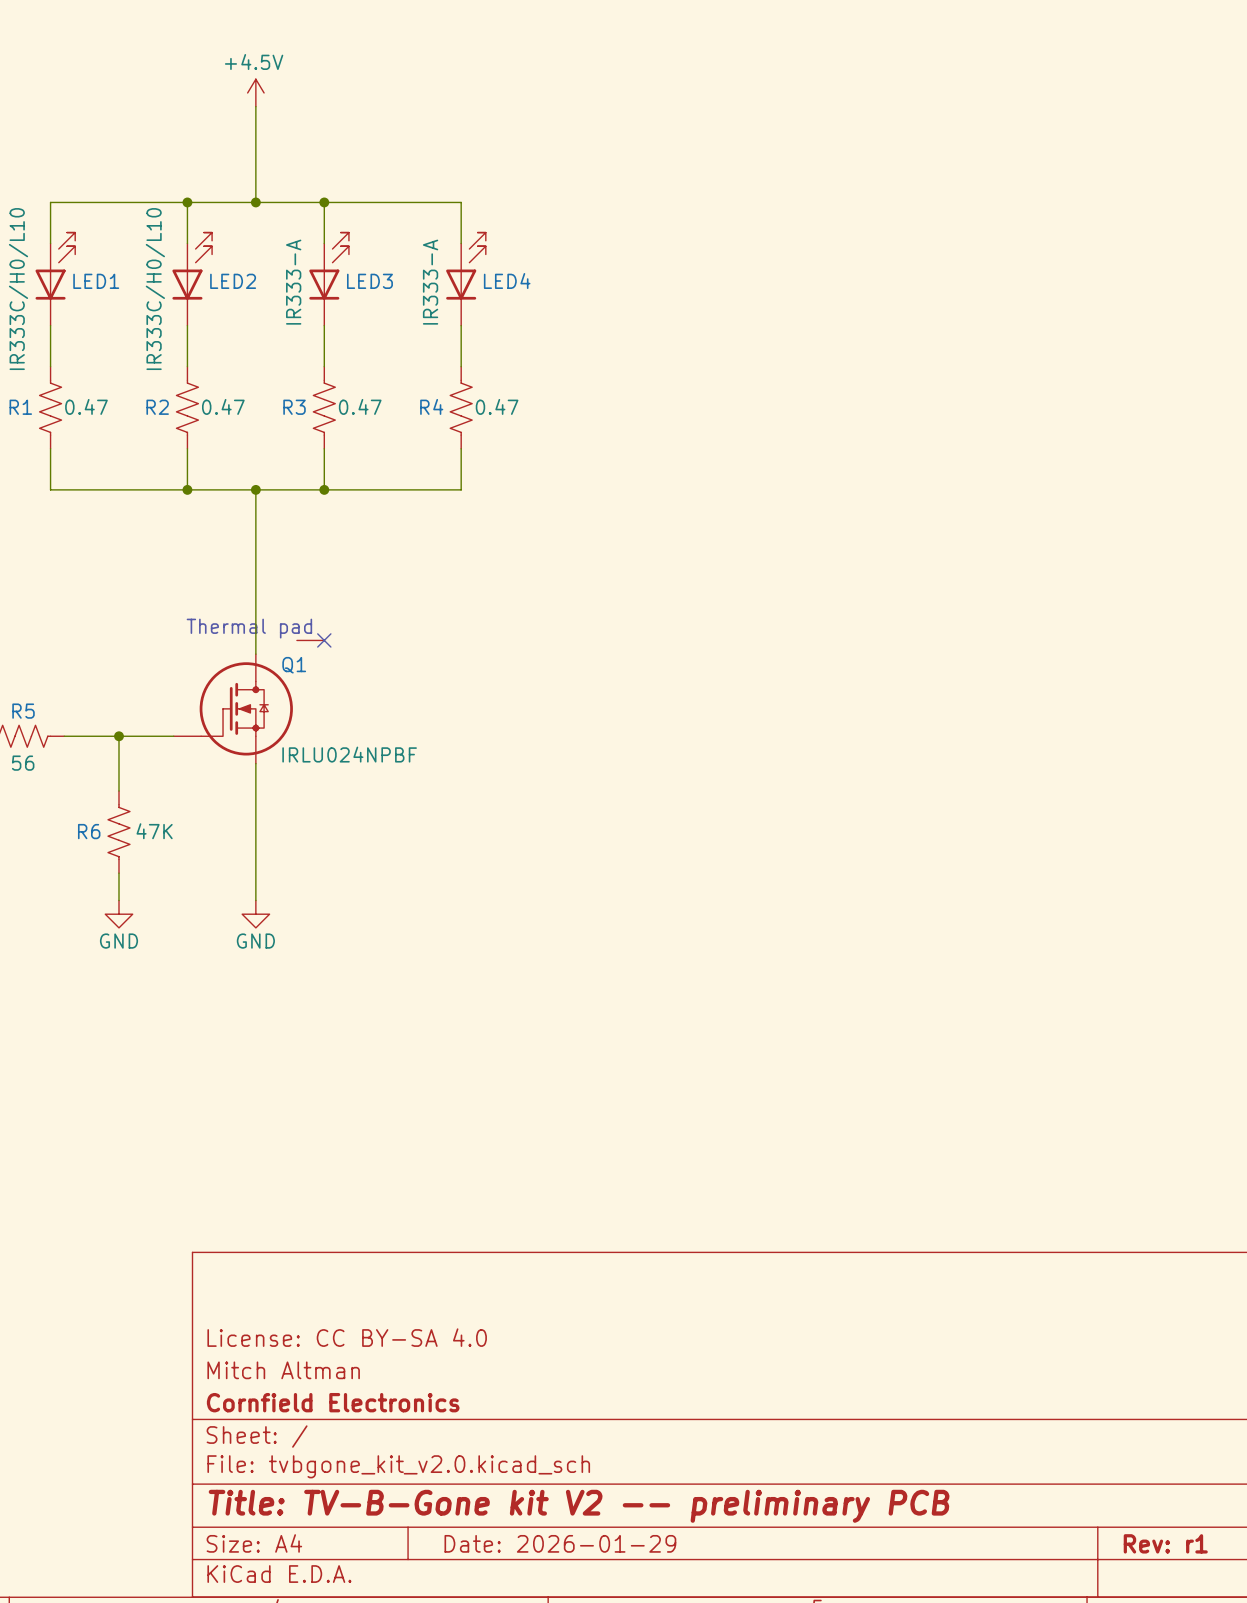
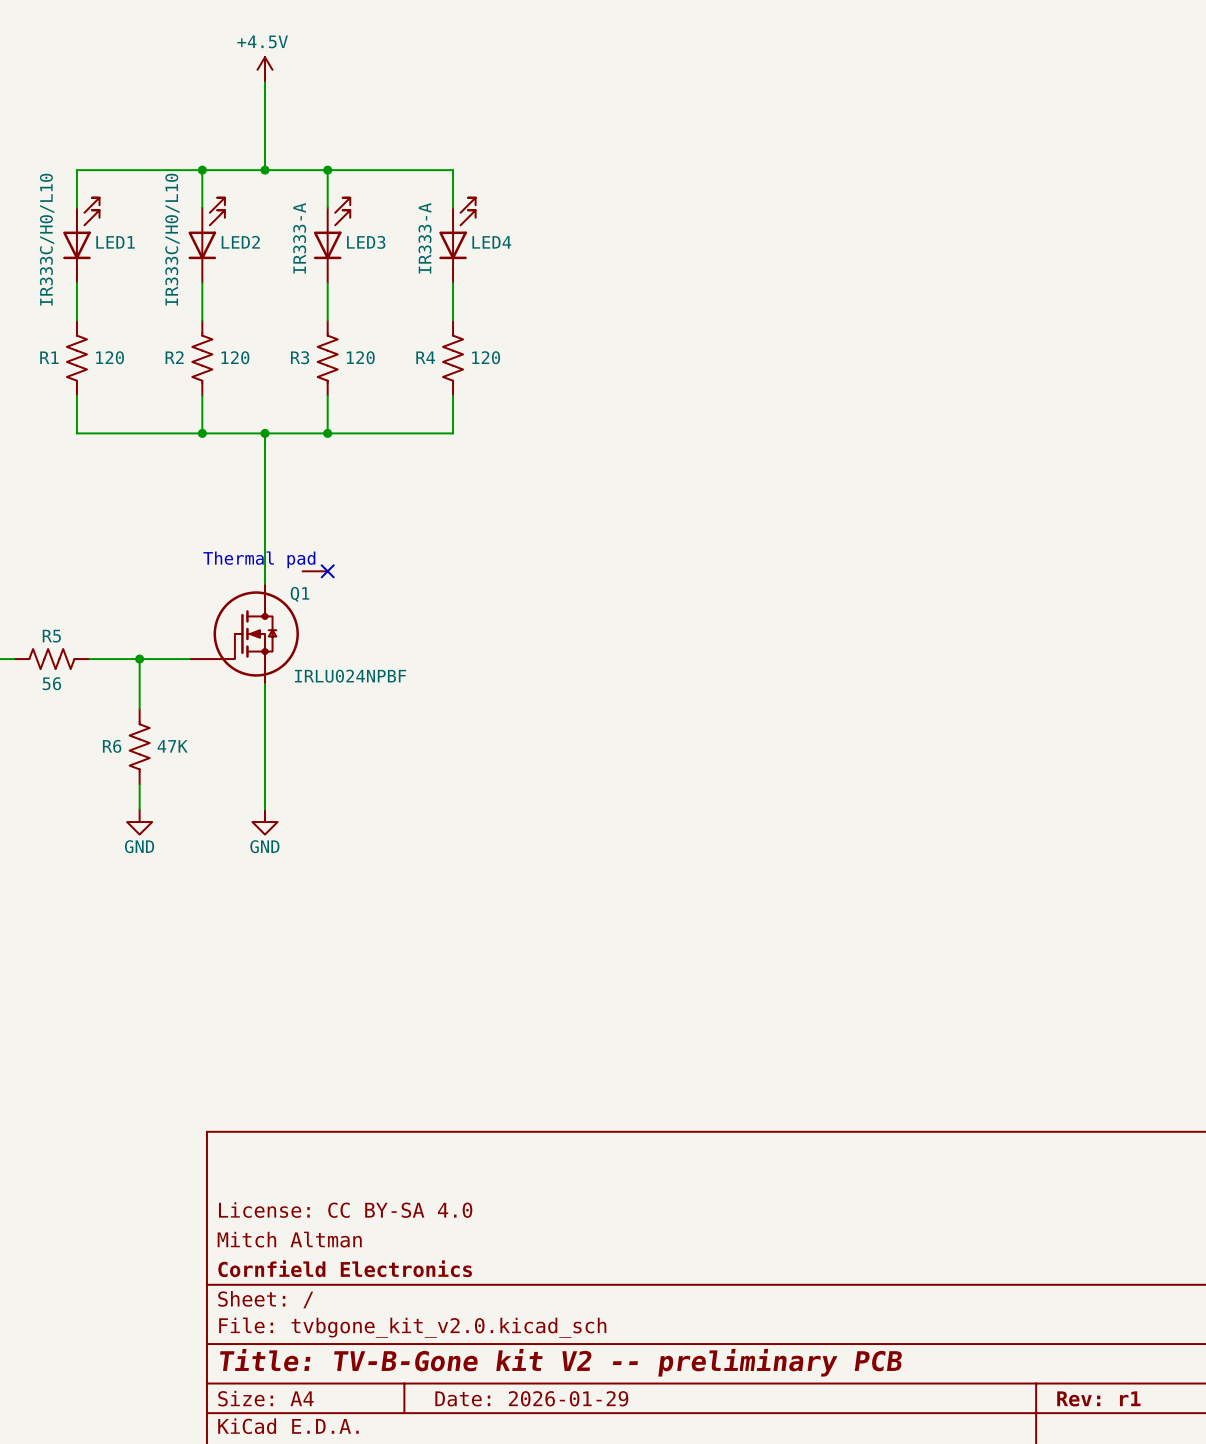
R1 value: 0.47 (86, 406) -> 120 (110, 357)
R2 value: 0.47 (223, 406) -> 120 (235, 357)
R3 value: 0.47 (360, 406) -> 120 (360, 357)
R4 value: 0.47 (497, 406) -> 120 (486, 357)

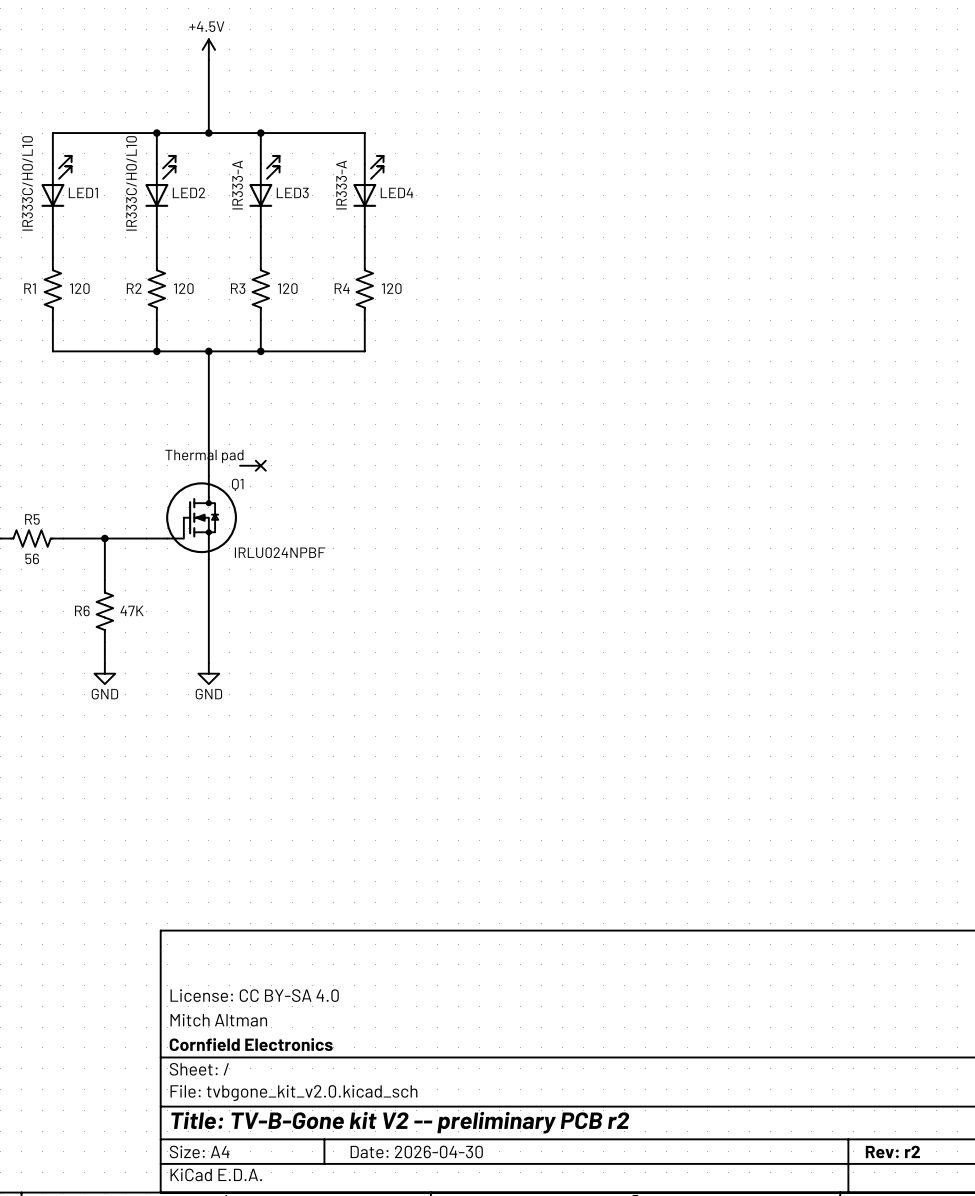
title block: Title: TV-B-Gone kit V2 -- preliminary PCB (561, 1362) -> Title: TV-B-Gone kit V2 -- preliminary PCB r2 (400, 1122)
title block: Date: 2026-01-29 (531, 1398) -> Date: 2026-04-30 (416, 1152)
title block: Rev: r1 (1098, 1398) -> Rev: r2 (892, 1151)

